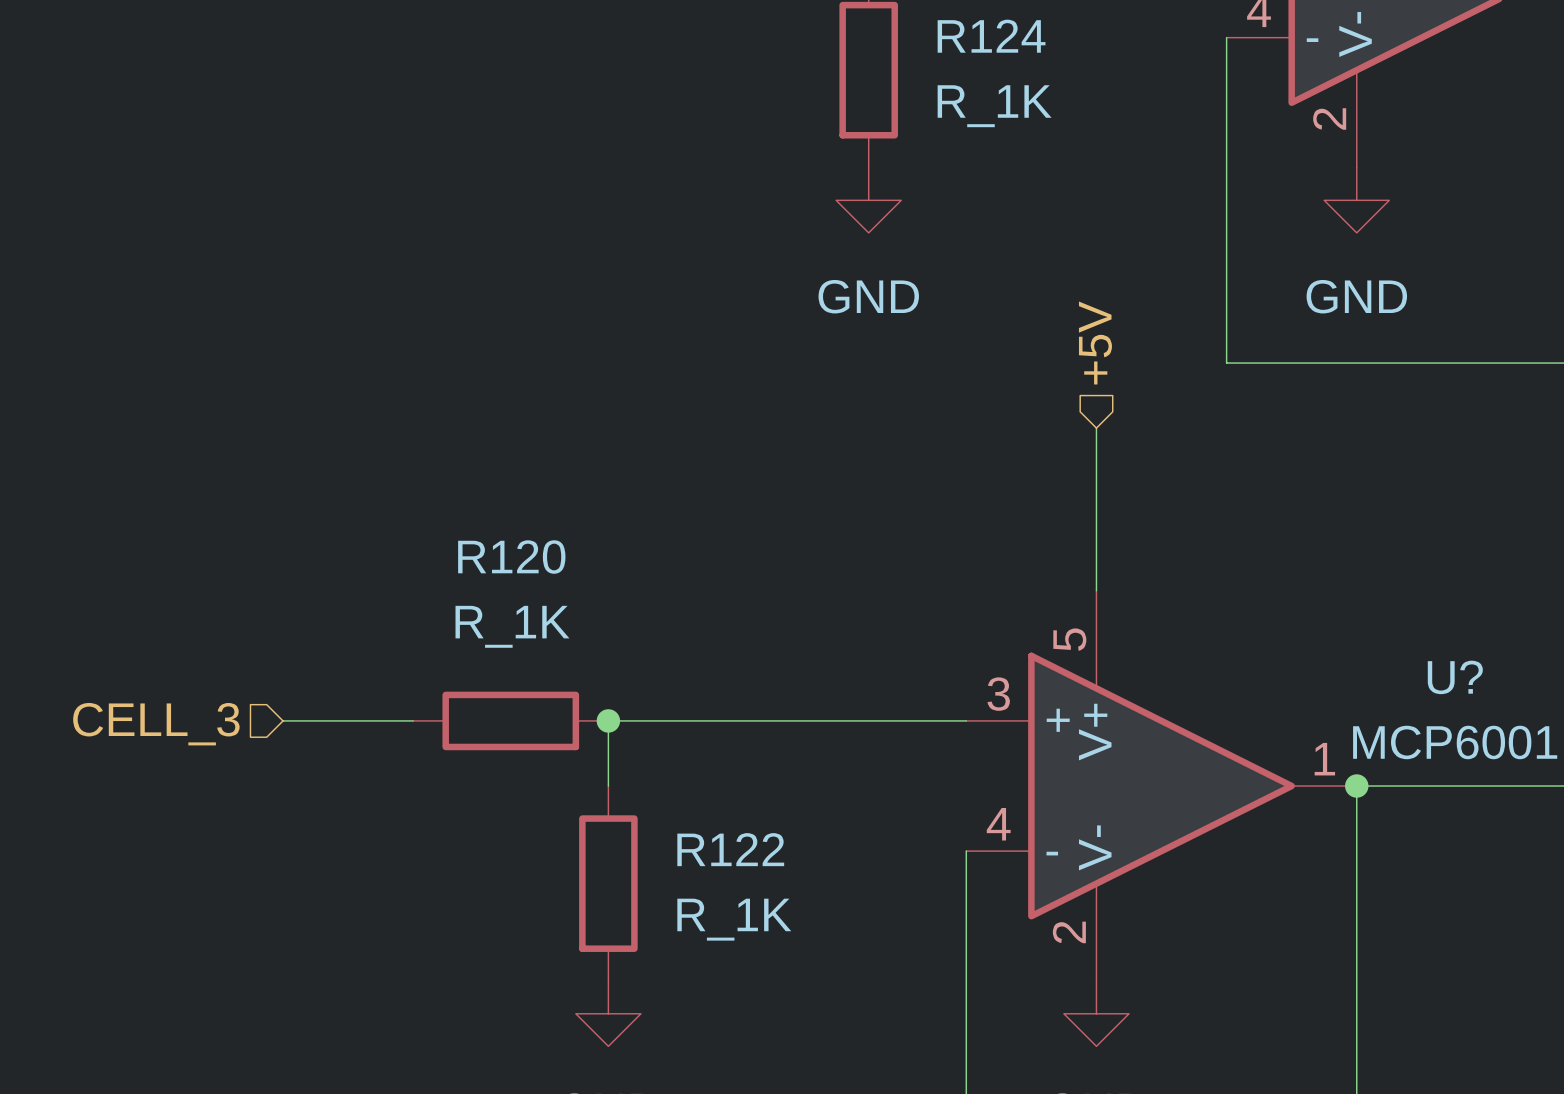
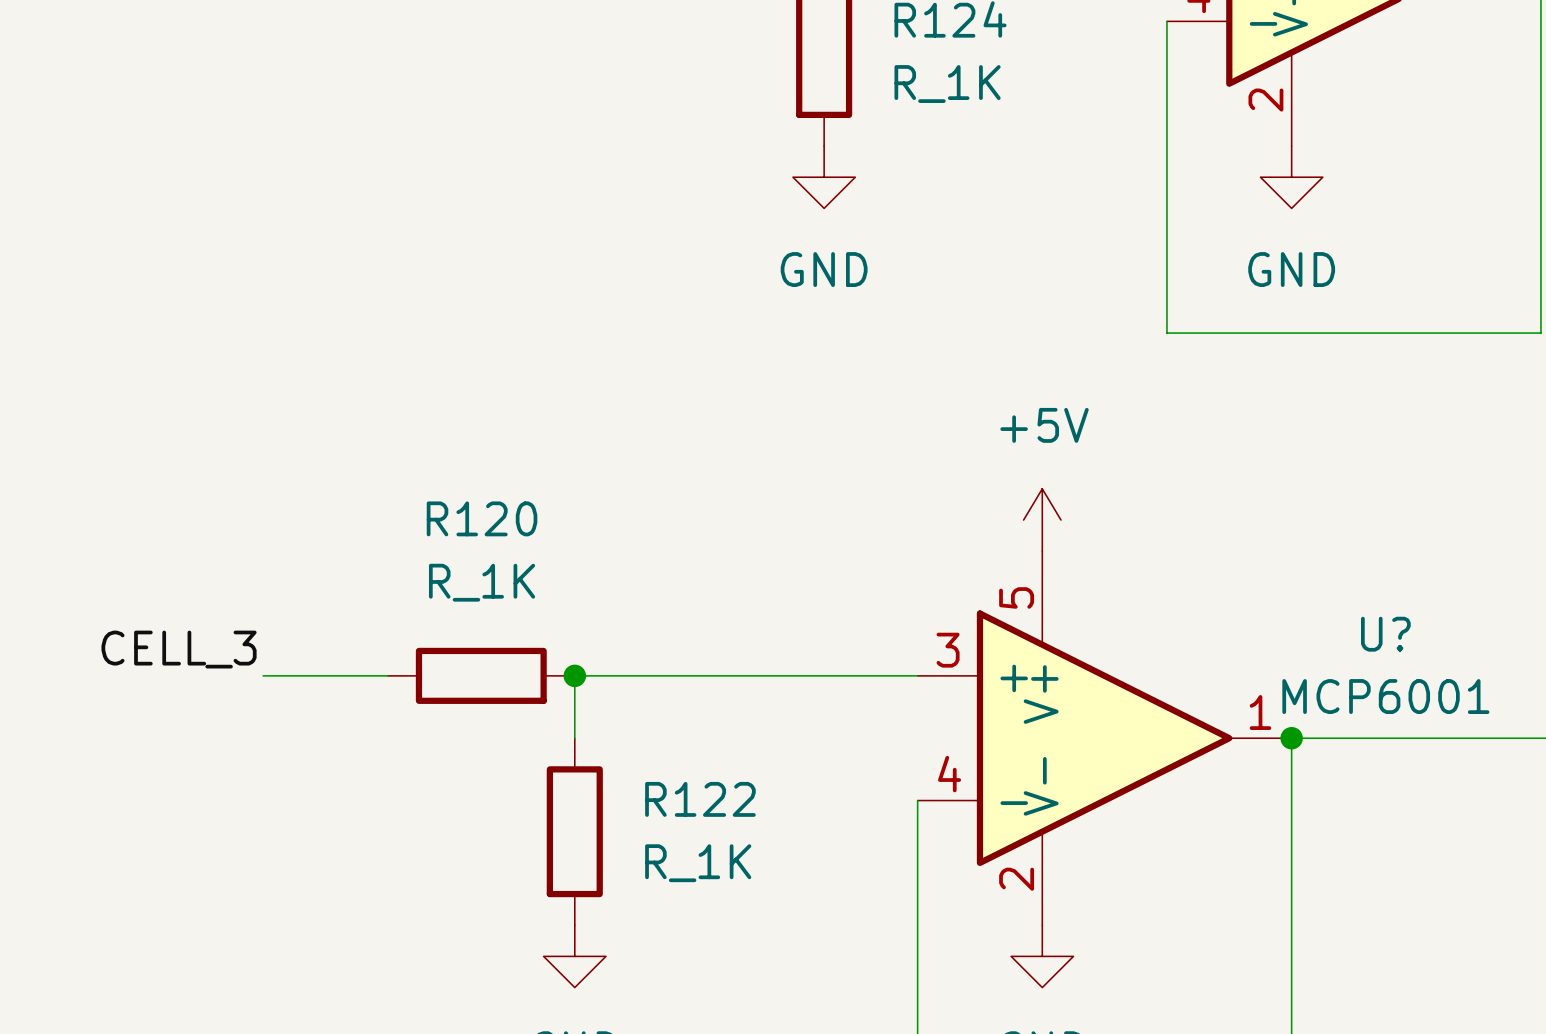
hierarchical label: +5V (1095, 342) -> none
wire: (1096, 428) (1096, 590) -> none
power symbol: none -> +5V (1042, 520)
label: none -> CELL_3 (179, 649)
hierarchical label: CELL_3 (156, 724) -> none

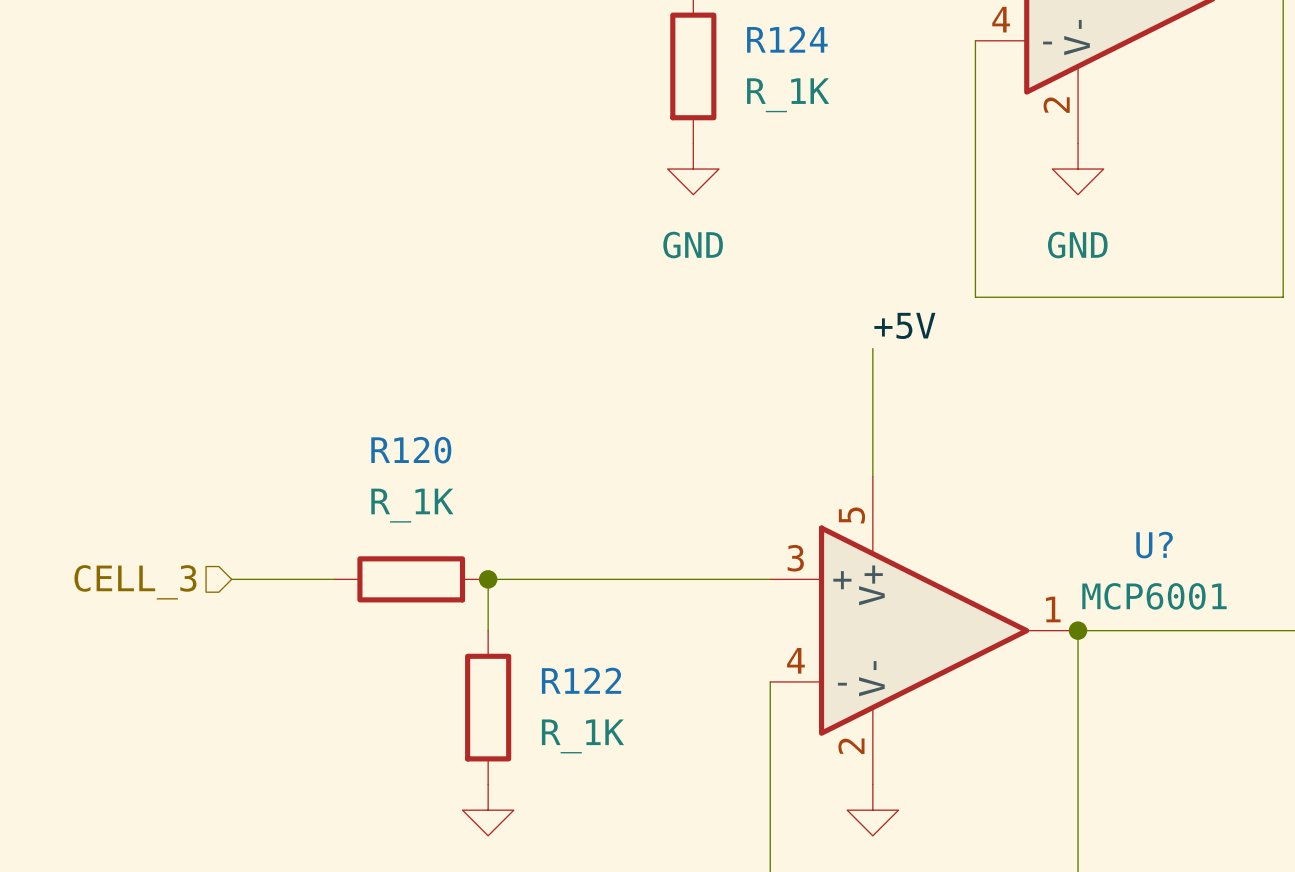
label: none -> +5V (904, 325)
wire: none -> (872, 348) (872, 476)
power symbol: +5V (1042, 520) -> none
label: CELL_3 (179, 649) -> none
hierarchical label: none -> CELL_3 (135, 582)

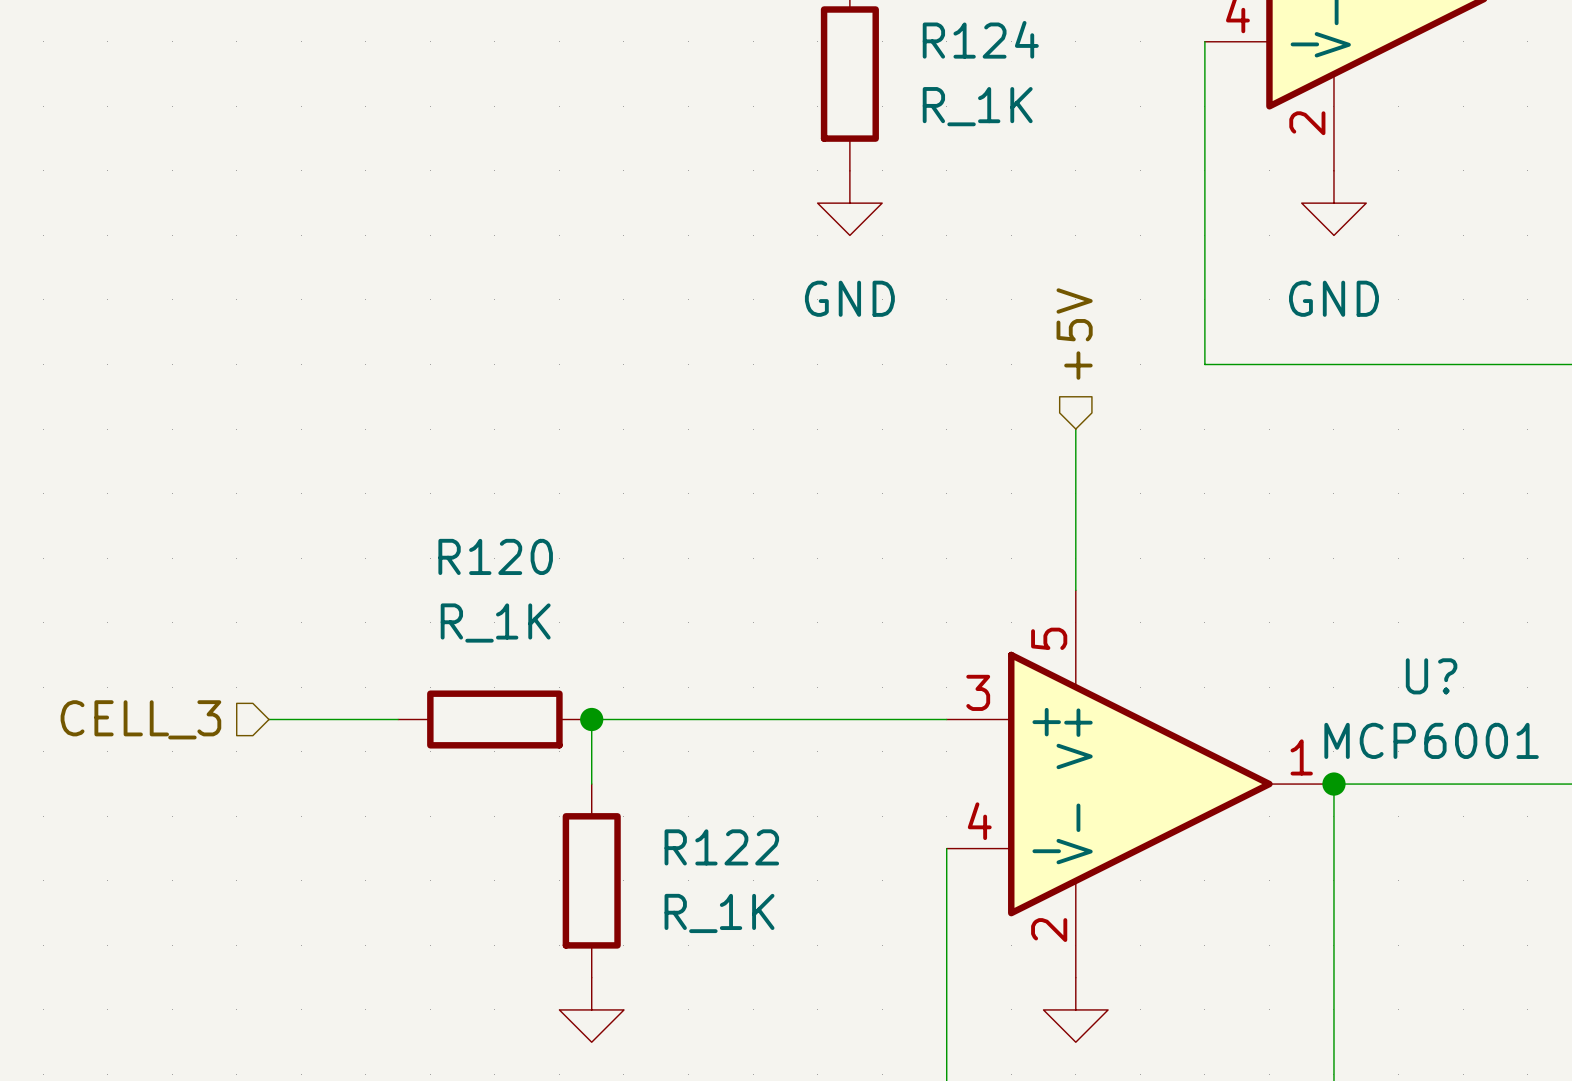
hierarchical label: none -> +5V (1074, 334)
label: +5V (904, 325) -> none

